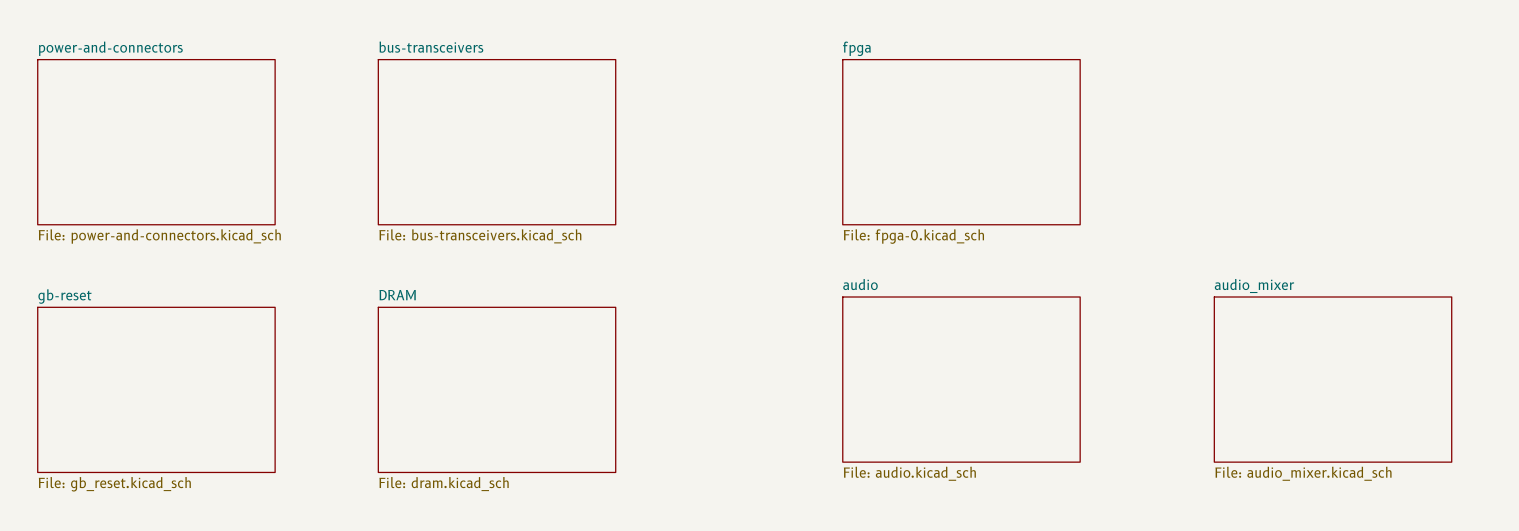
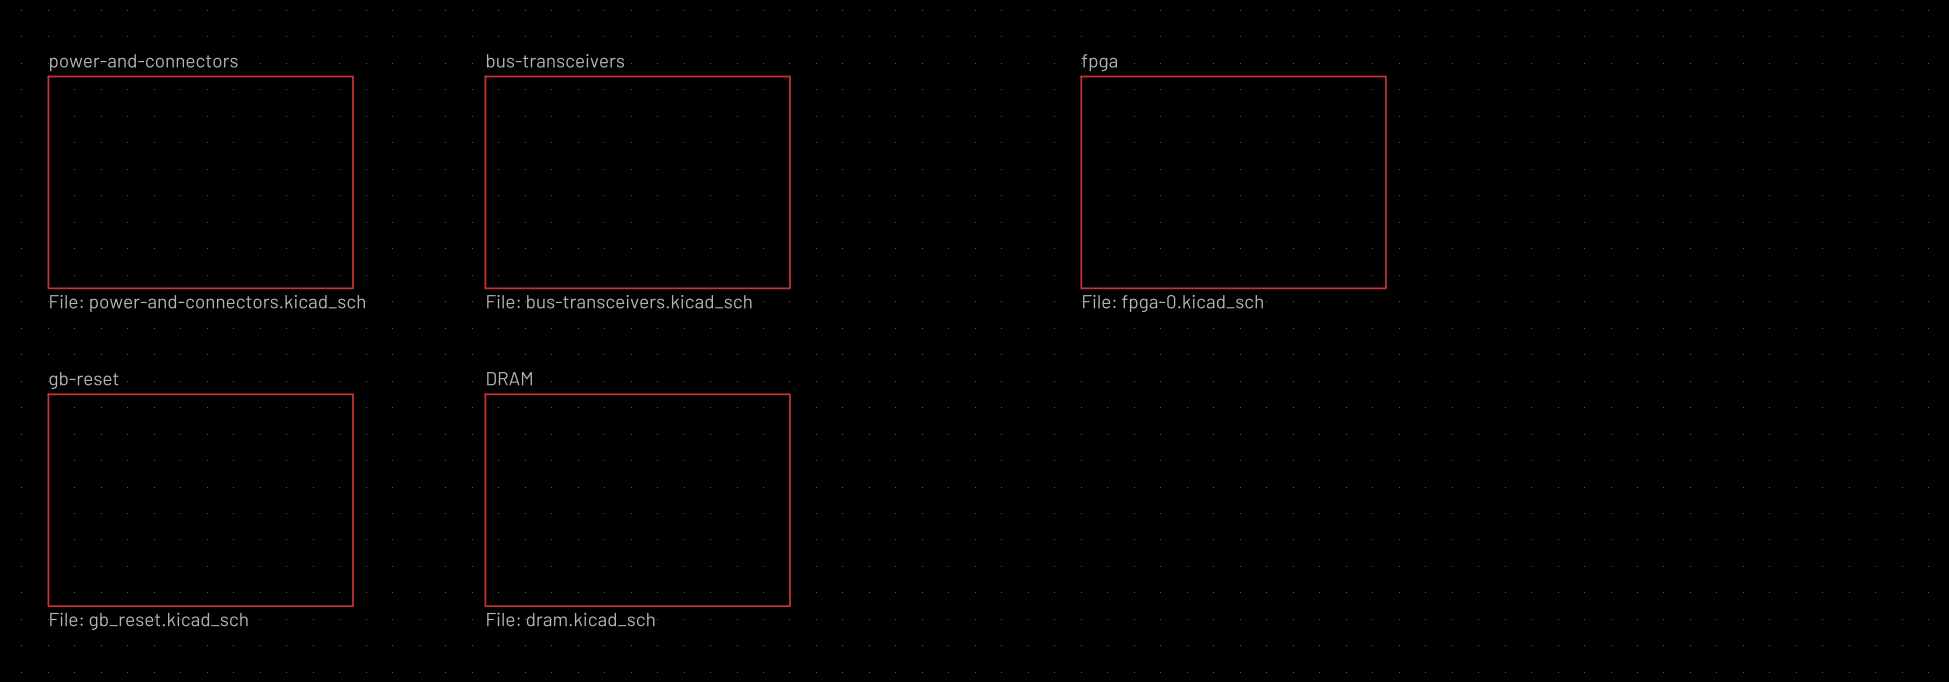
sheet audio: File: audio.kicad_sch (961, 379) -> none
sheet audio_mixer: File: audio_mixer.kicad_sch (1333, 379) -> none

